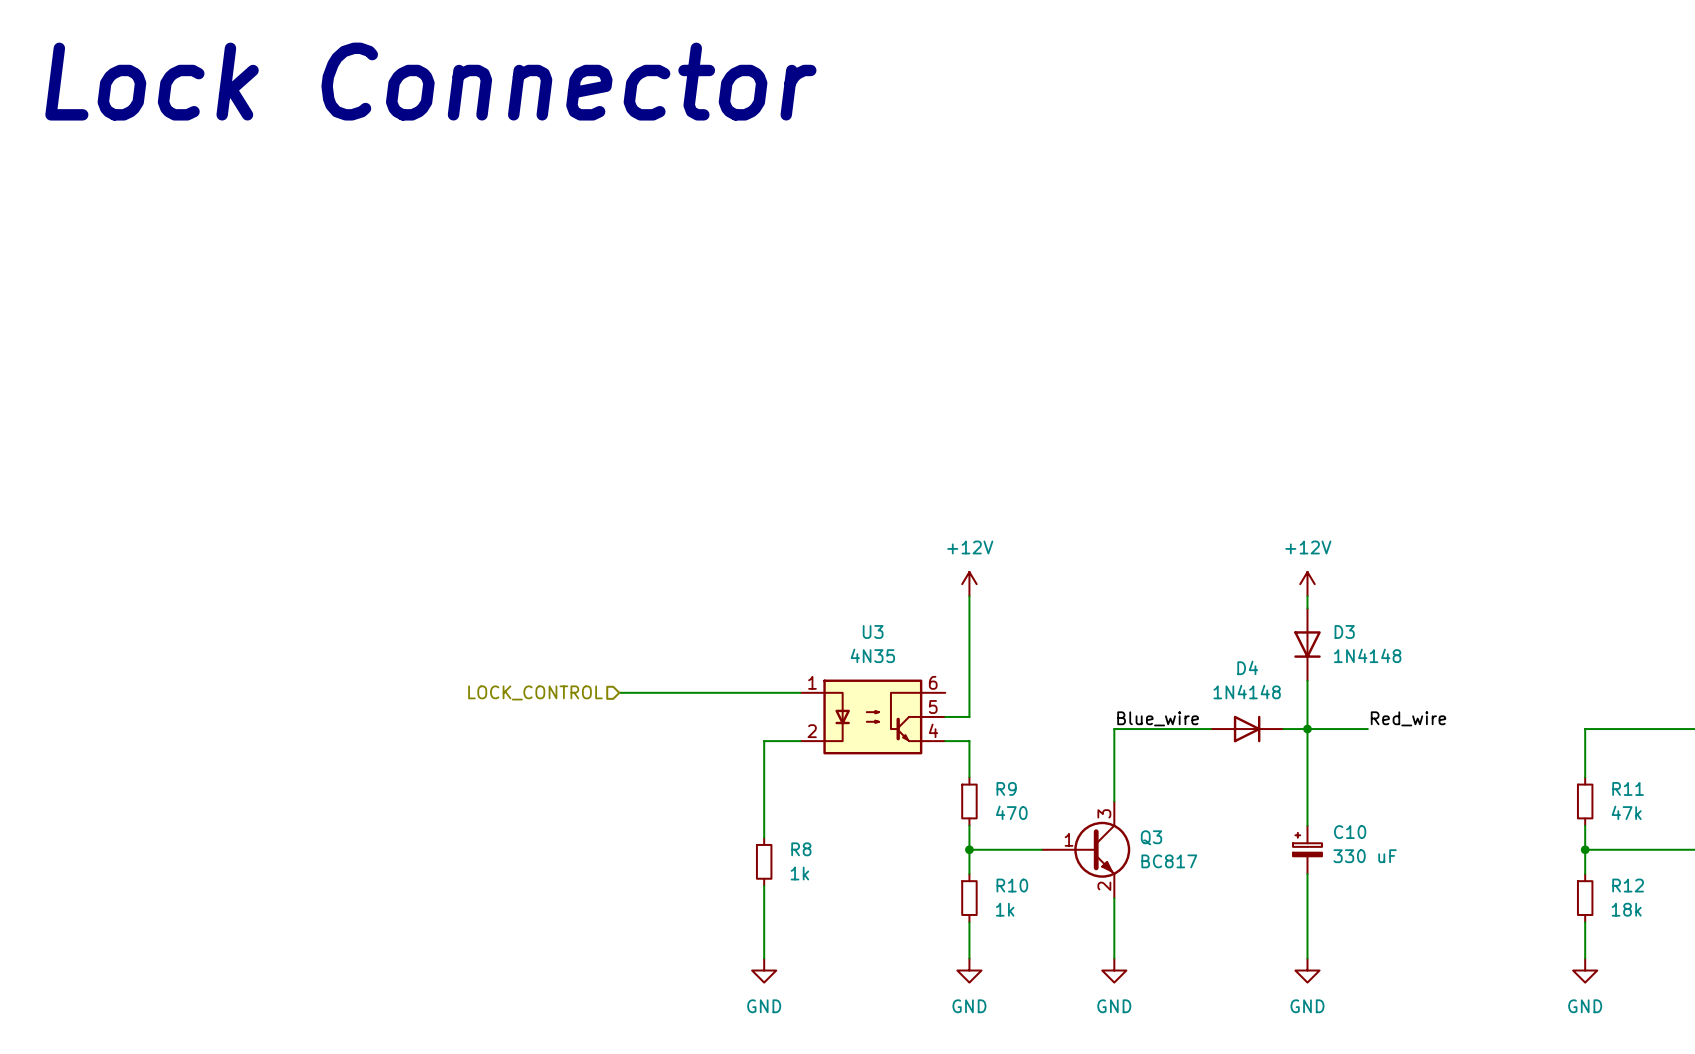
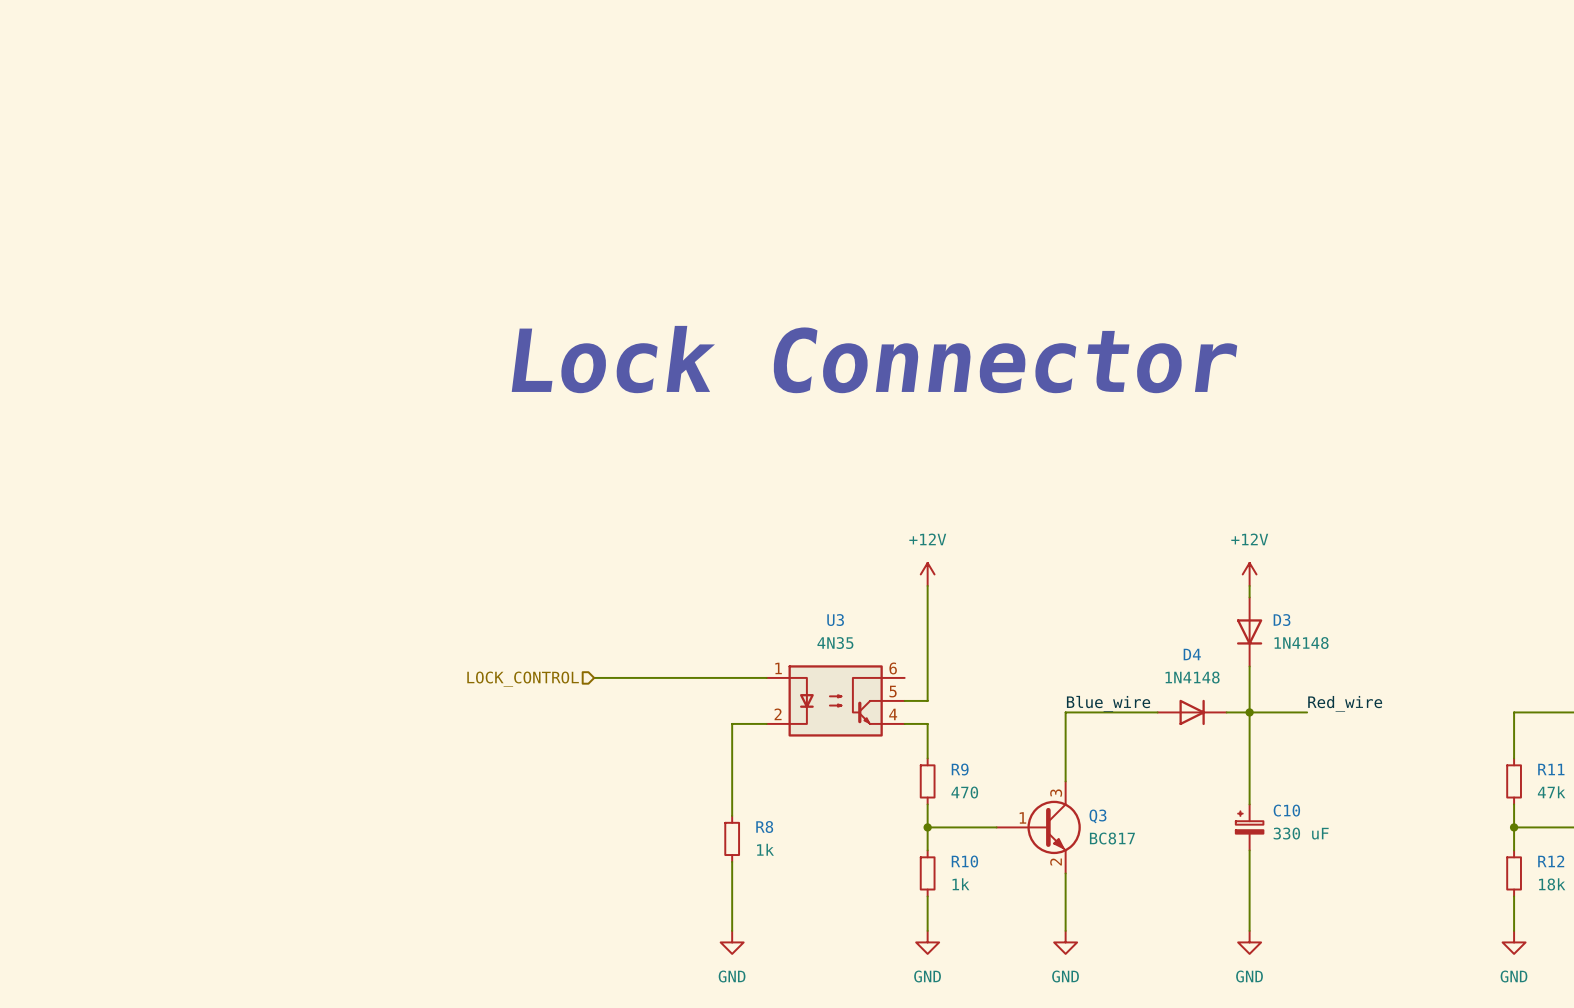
text: Lock Connector (430, 81) -> none
text: none -> Lock Connector (874, 359)

